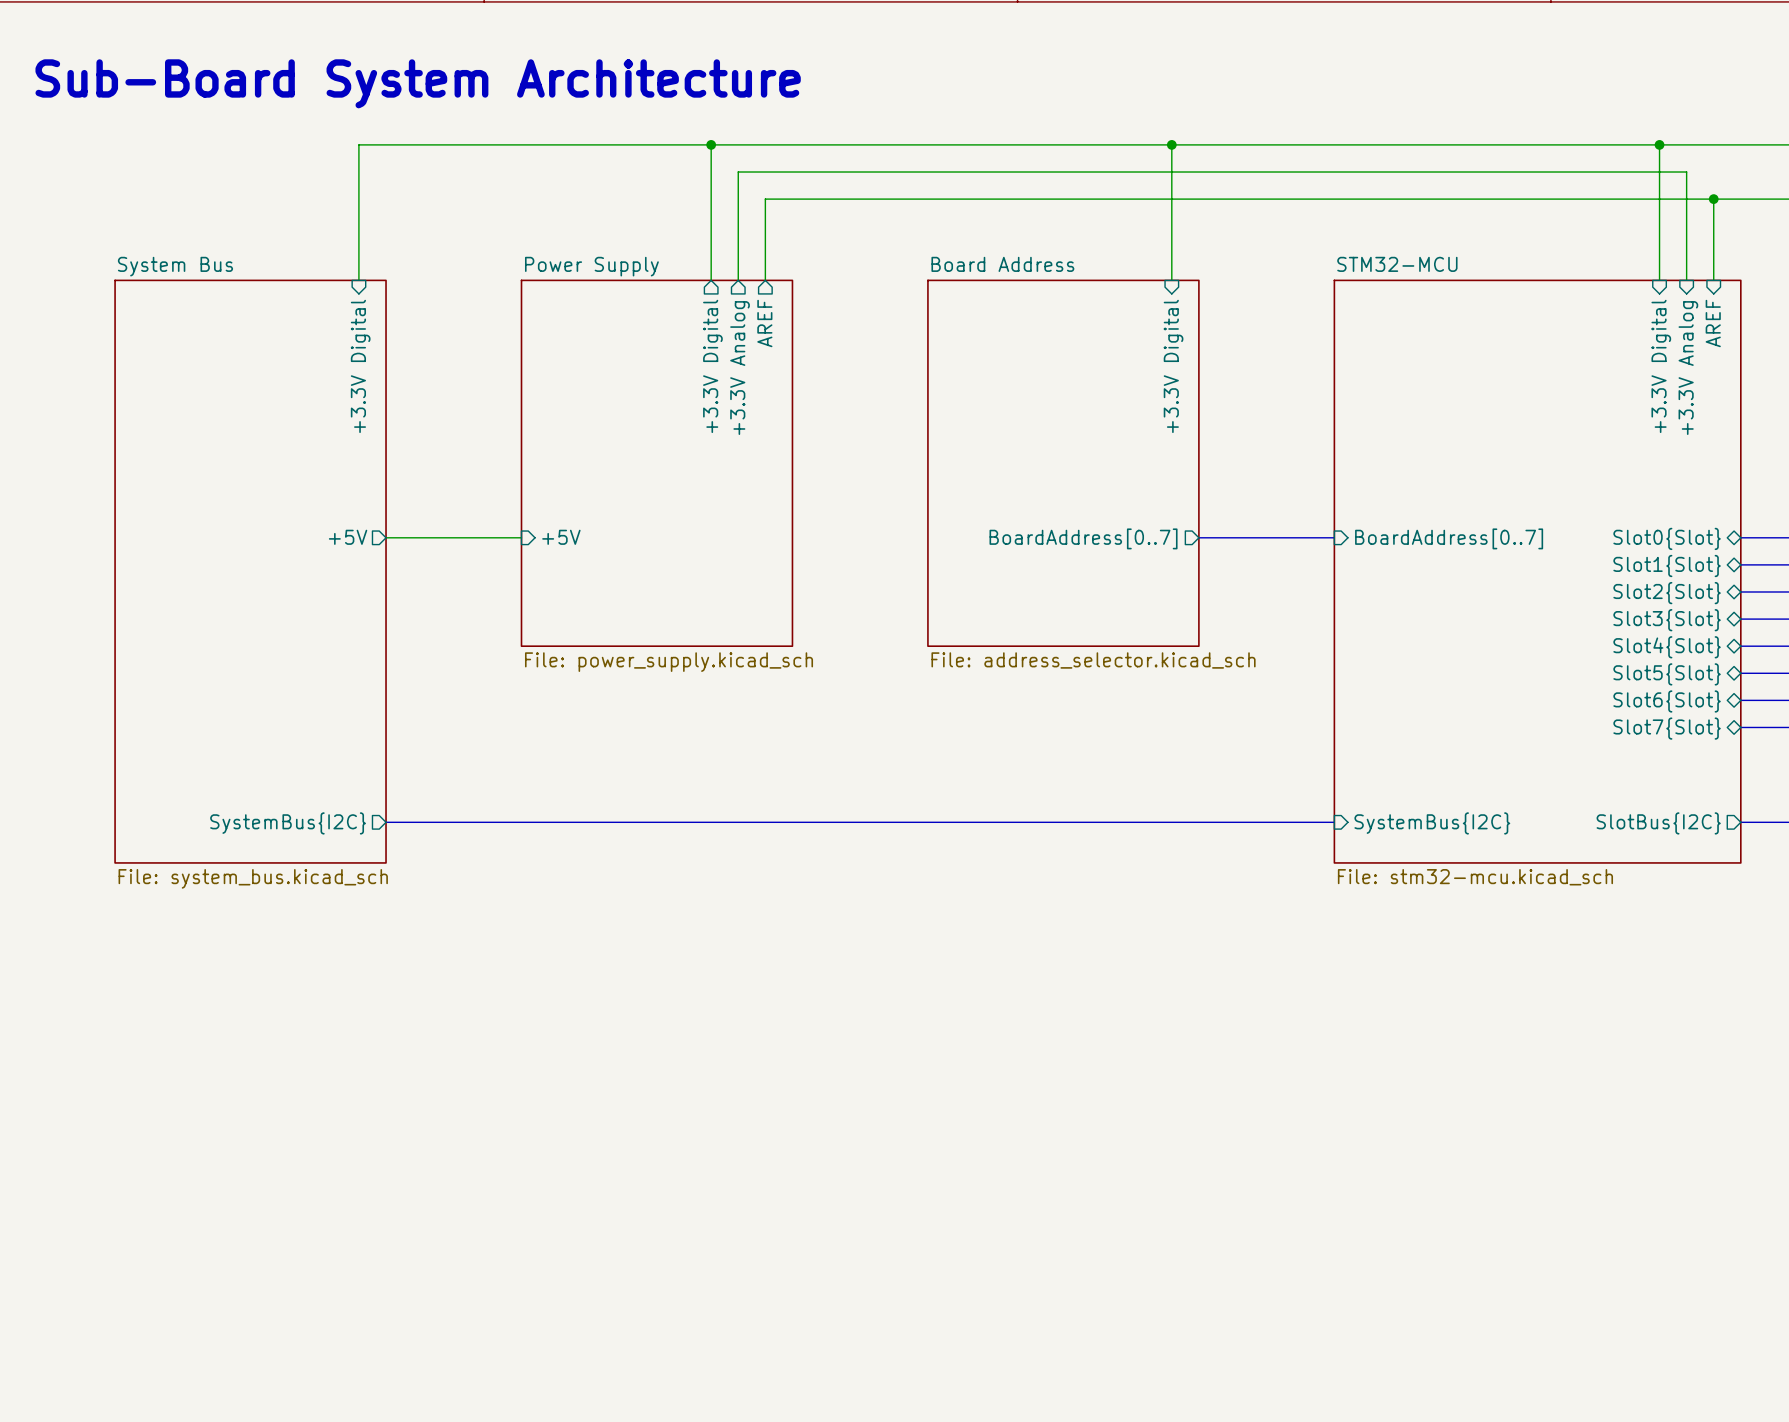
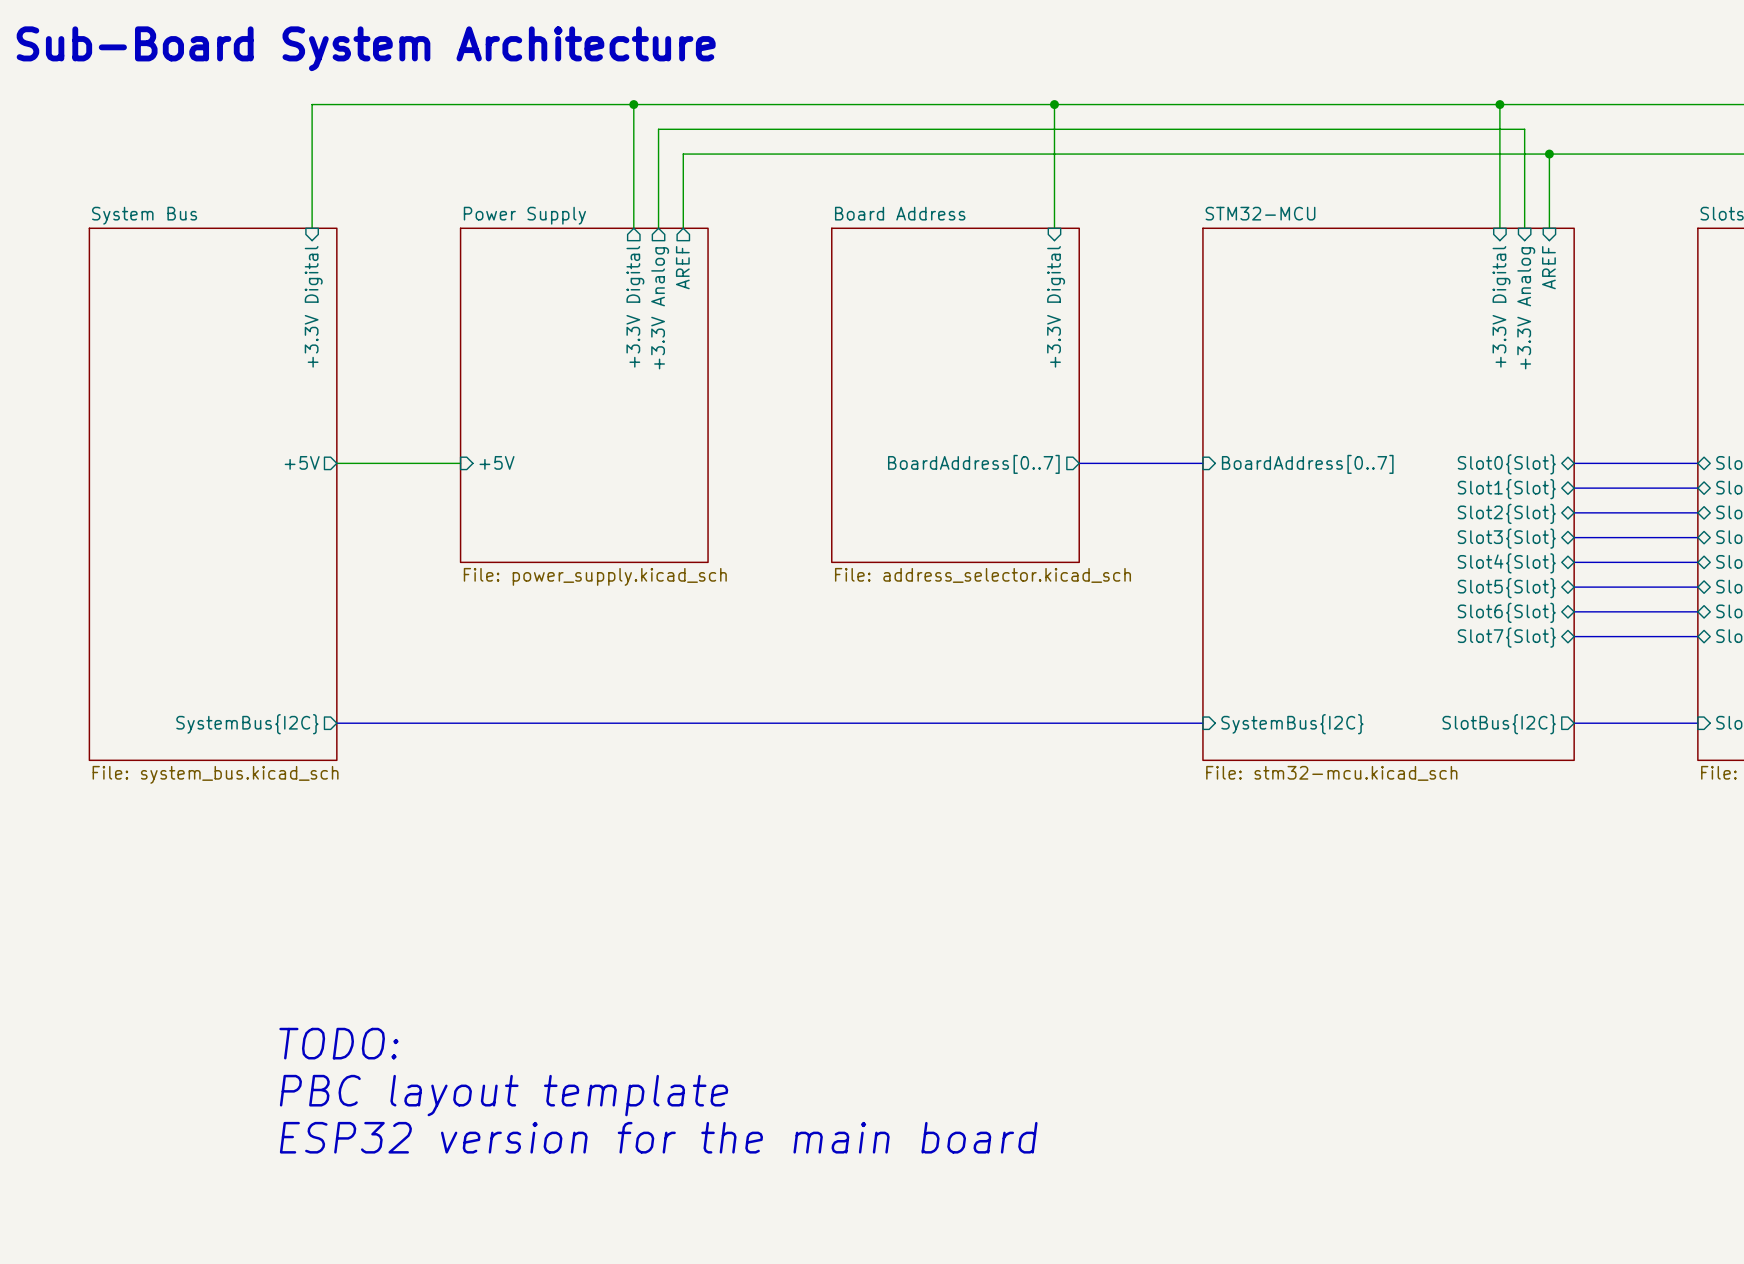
text: none -> TODO: (338, 1043)
text: none -> PBC layout template (504, 1095)
text: none -> ESP32 version for the main board (658, 1137)

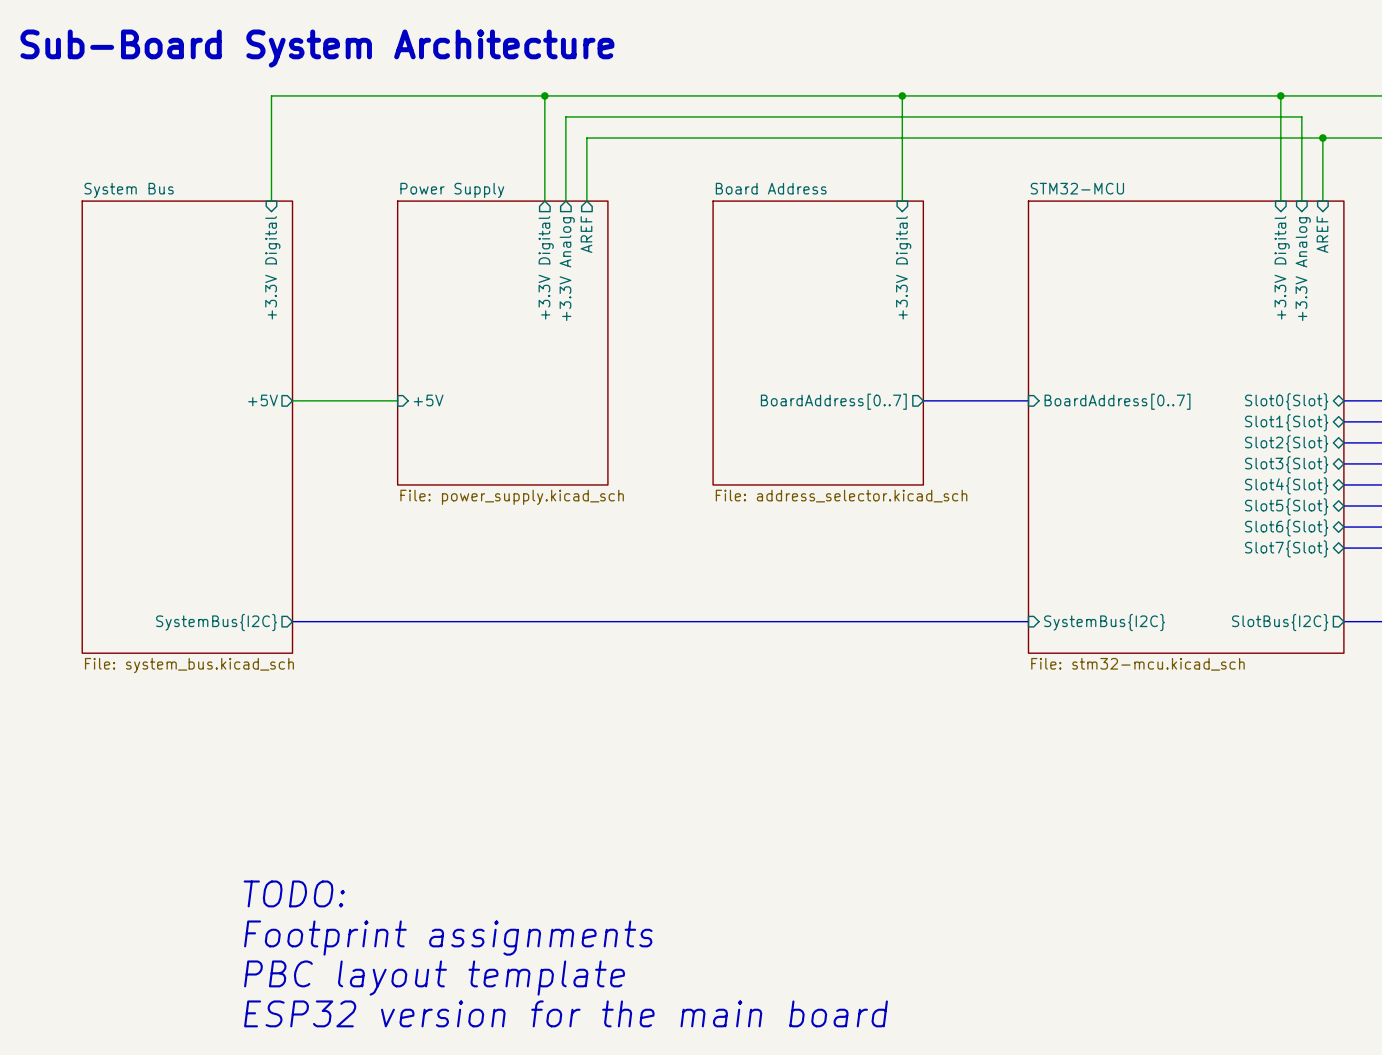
text: PBC layout template (504, 1095) -> Footprint assignments (448, 938)
text: ESP32 version for the main board (658, 1137) -> PBC layout template (434, 978)
text: none -> ESP32 version for the main board (566, 1013)

